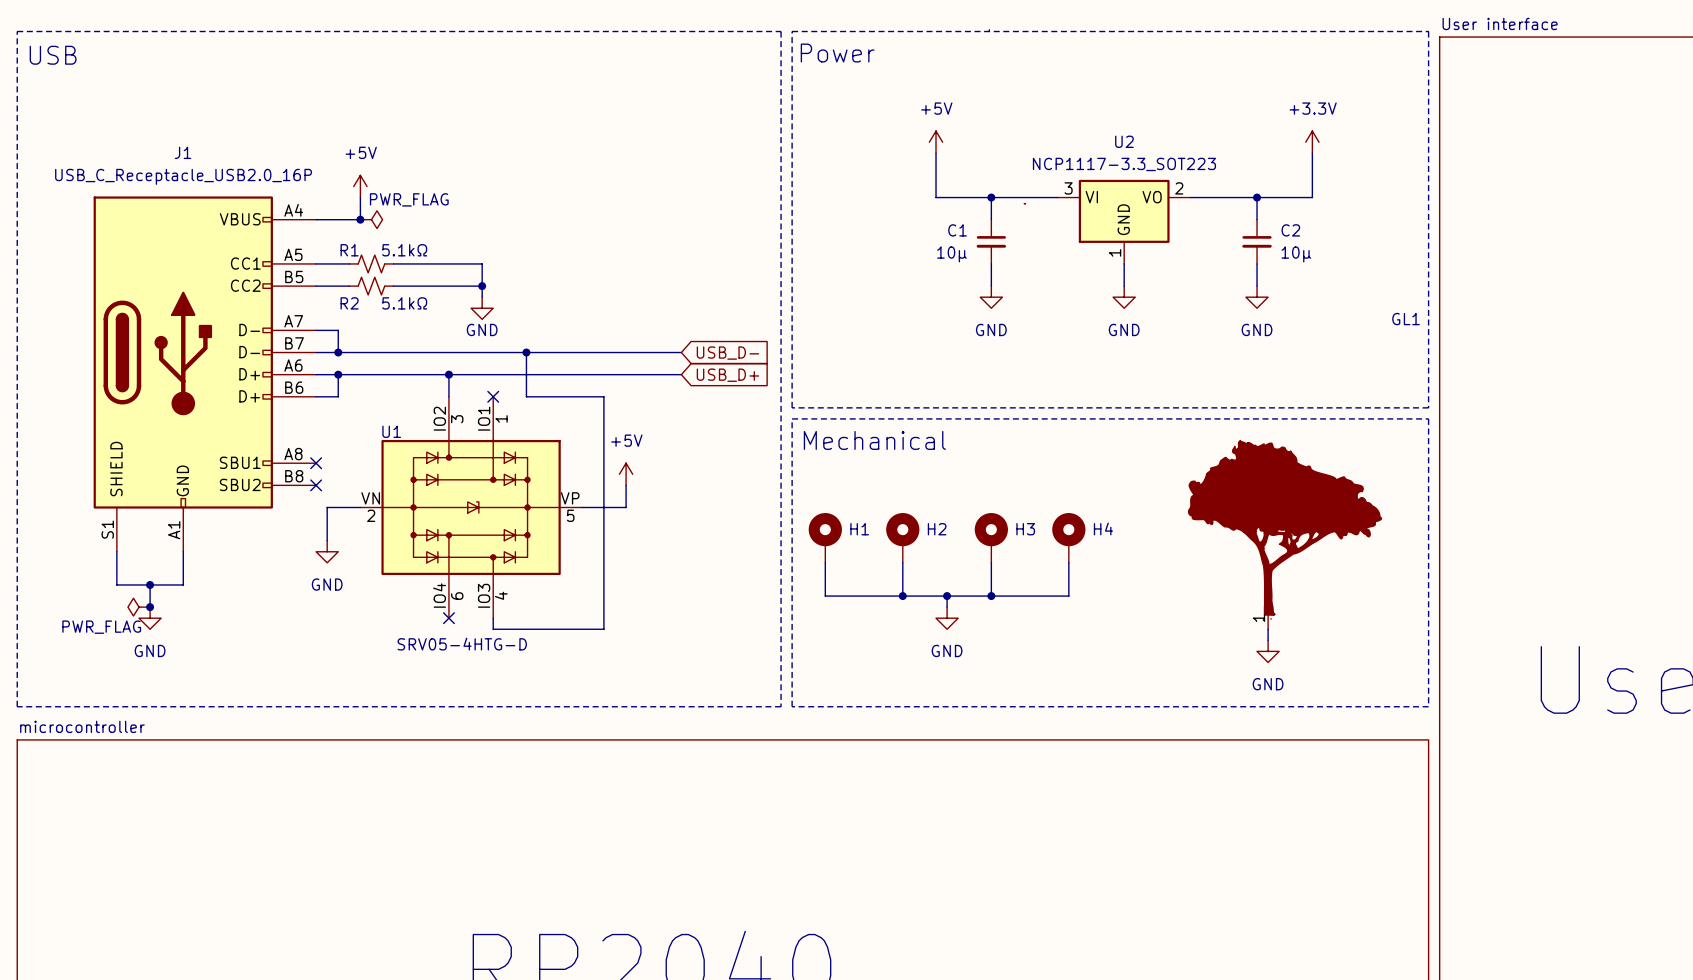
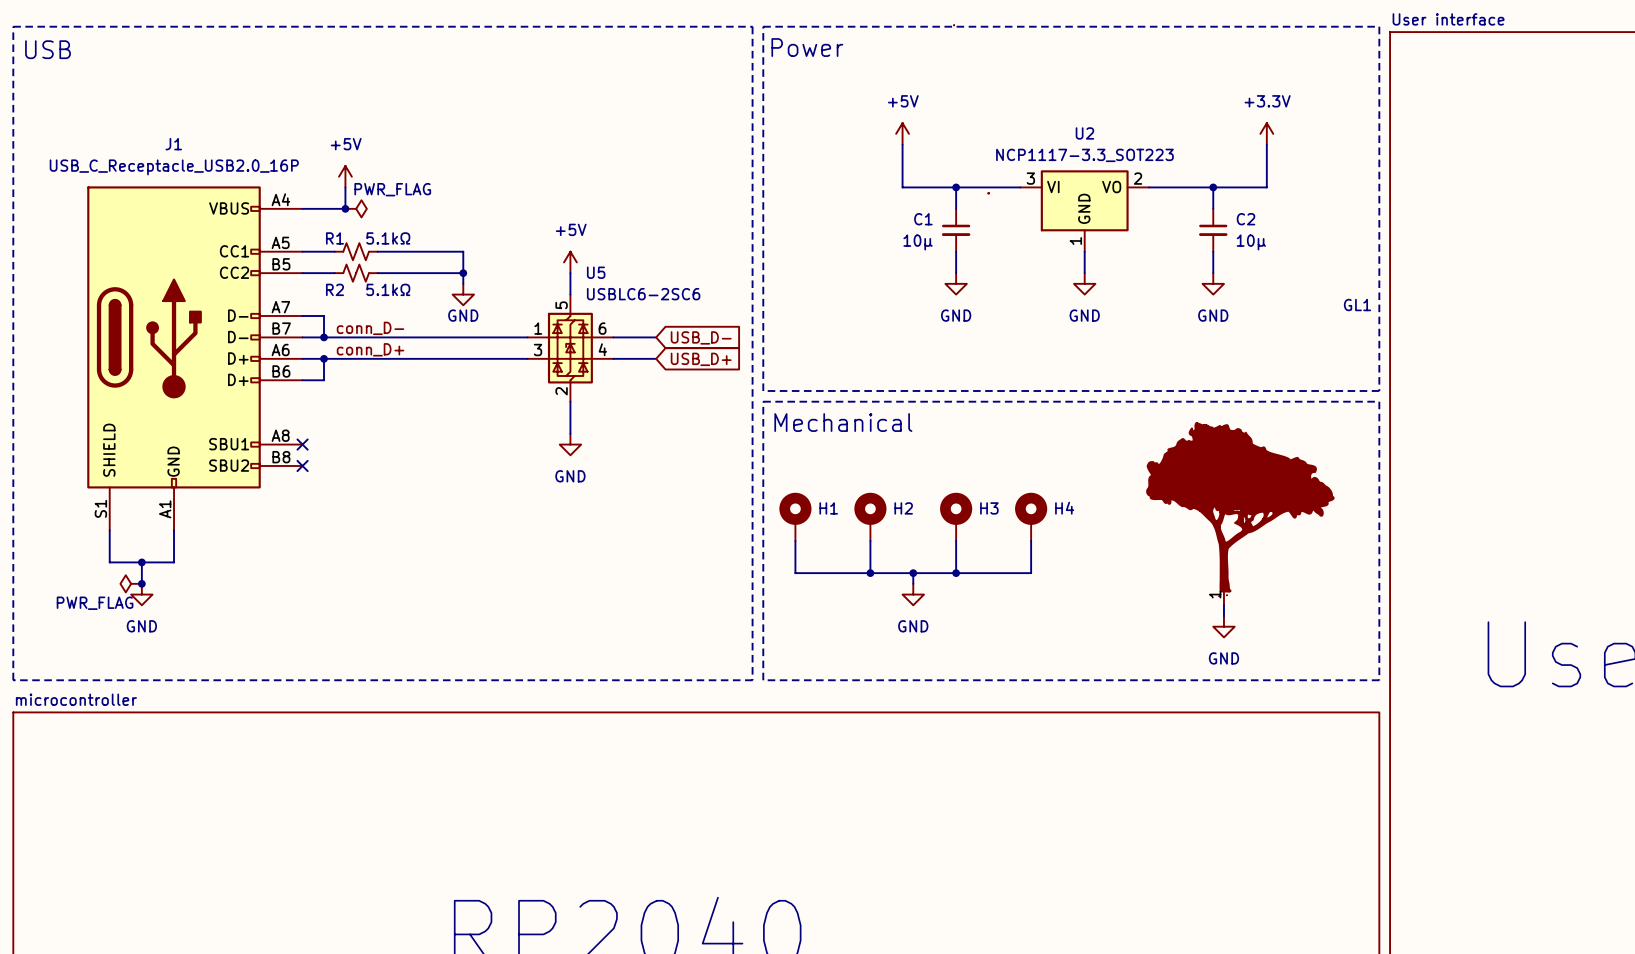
label: none -> conn_D- (370, 328)
wire: (526, 352) (526, 396) (603, 396) (603, 629) (493, 629) (493, 618) -> none
junction: (526, 352) -> none
U5: none -> USBLC6-2SC6 (570, 348)
label: none -> conn_D+ (370, 349)
wire: (448, 374) (448, 396) -> (570, 273) (570, 294)
junction: (448, 374) -> none
no-connect mark: (493, 396) -> none
wire: none -> (570, 401) (570, 433)
power symbol: none -> GND (570, 444)
power symbol position: +5V (626, 474) -> +5V (570, 262)
wire: (626, 485) (626, 507) (581, 507) -> none
wire: (360, 507) (327, 507) (327, 540) -> none
U1: SRV05-4HTG-D (471, 507) -> none
power symbol: GND (327, 551) -> none
no-connect mark: (448, 618) -> none

